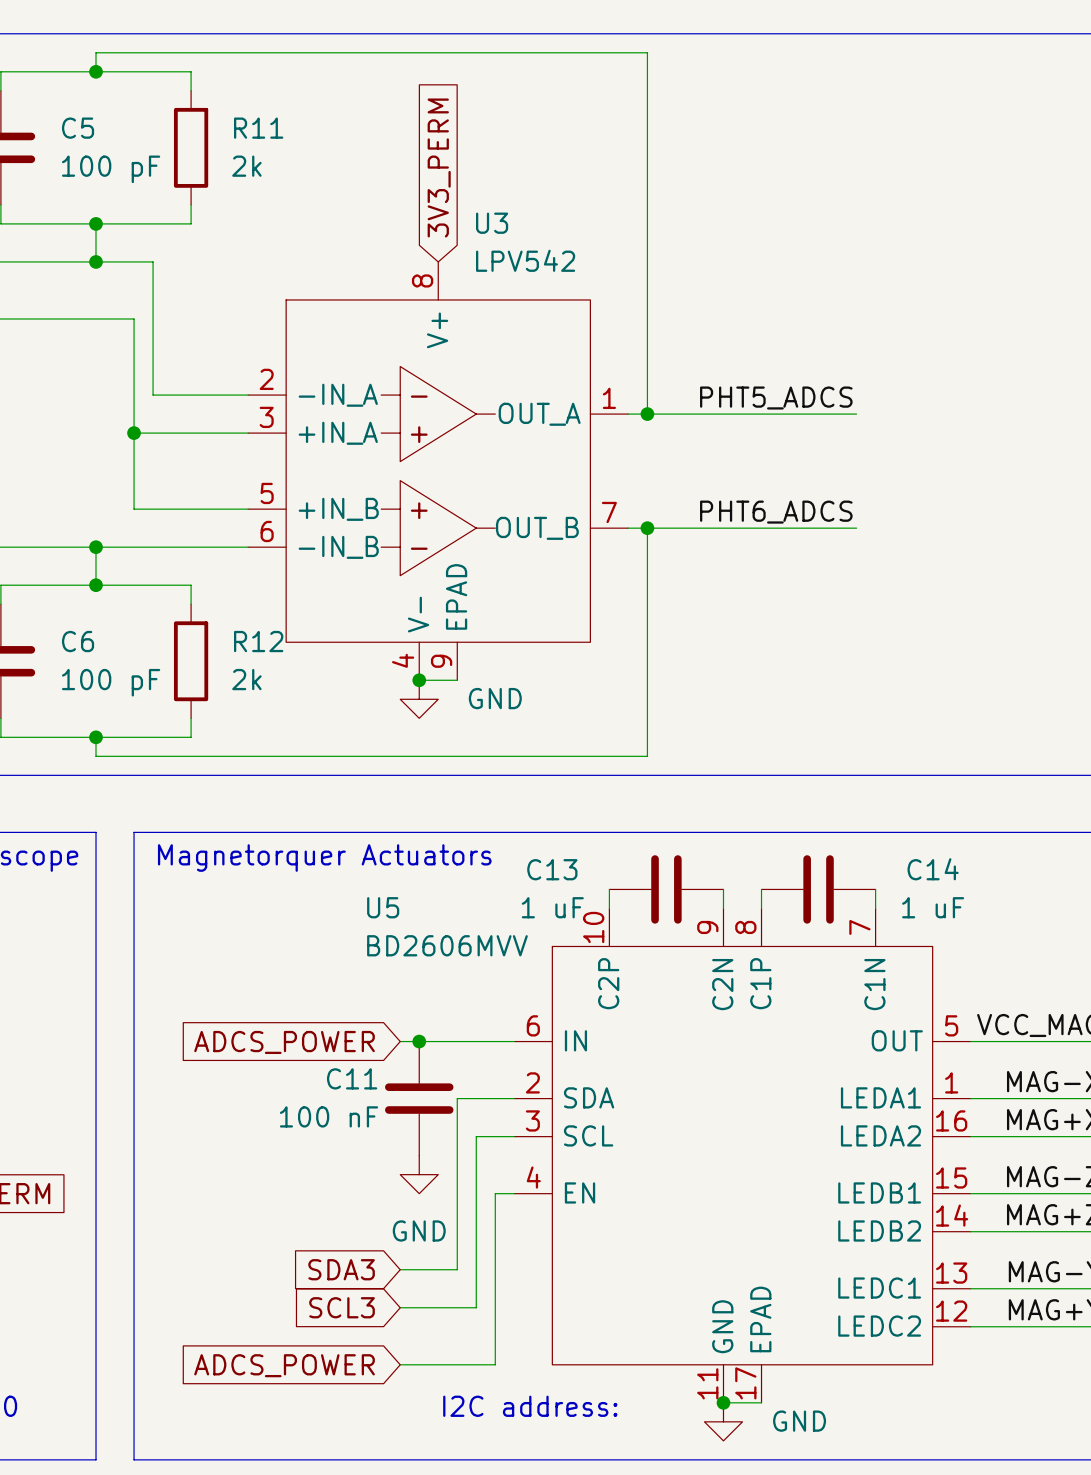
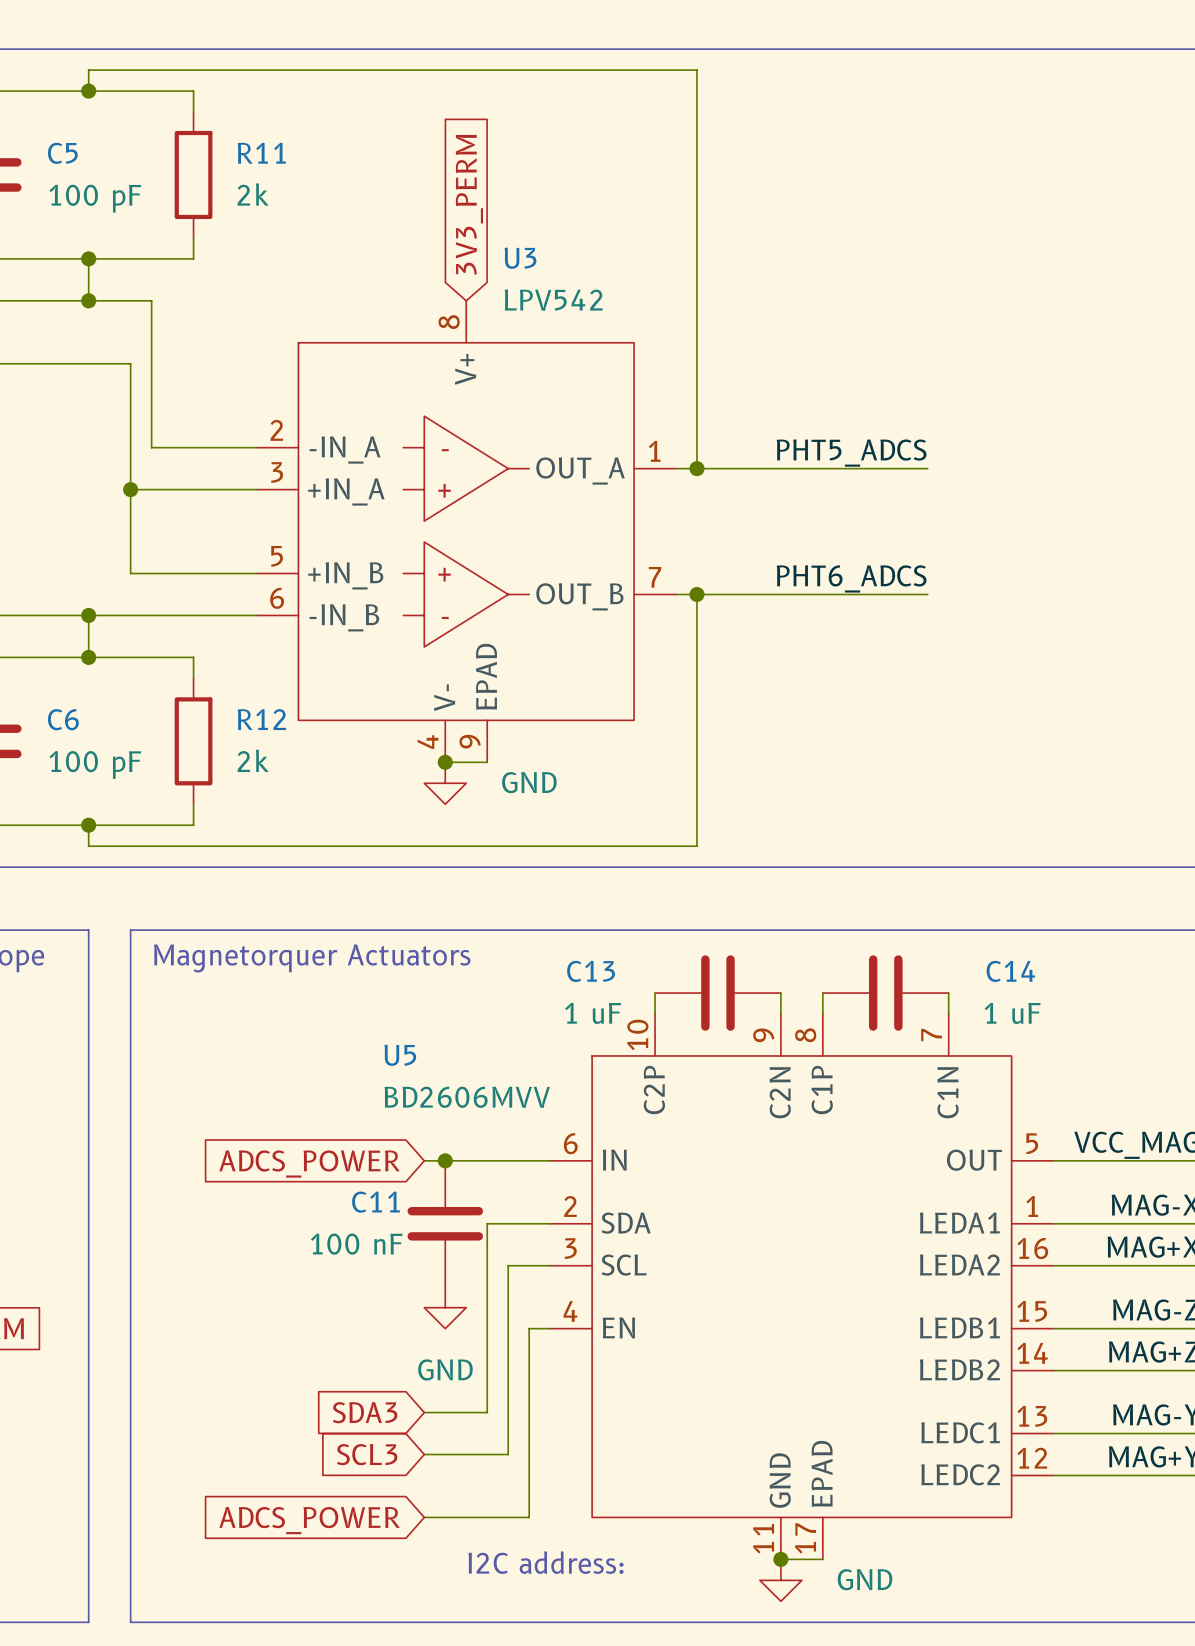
U5 name position: U5 (383, 907) -> U5 (400, 1055)
U5 value position: BD2606MVV (447, 945) -> BD2606MVV (467, 1097)

